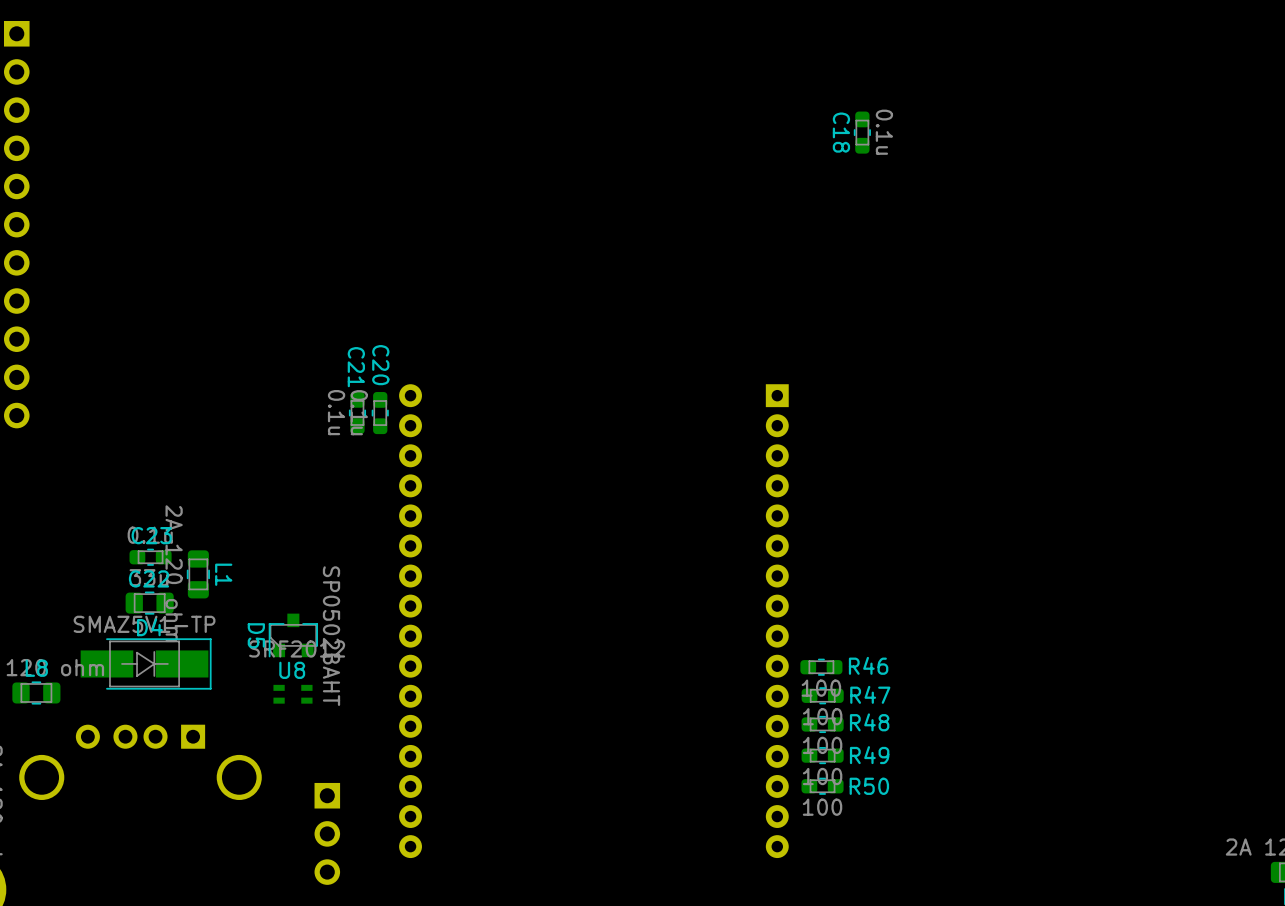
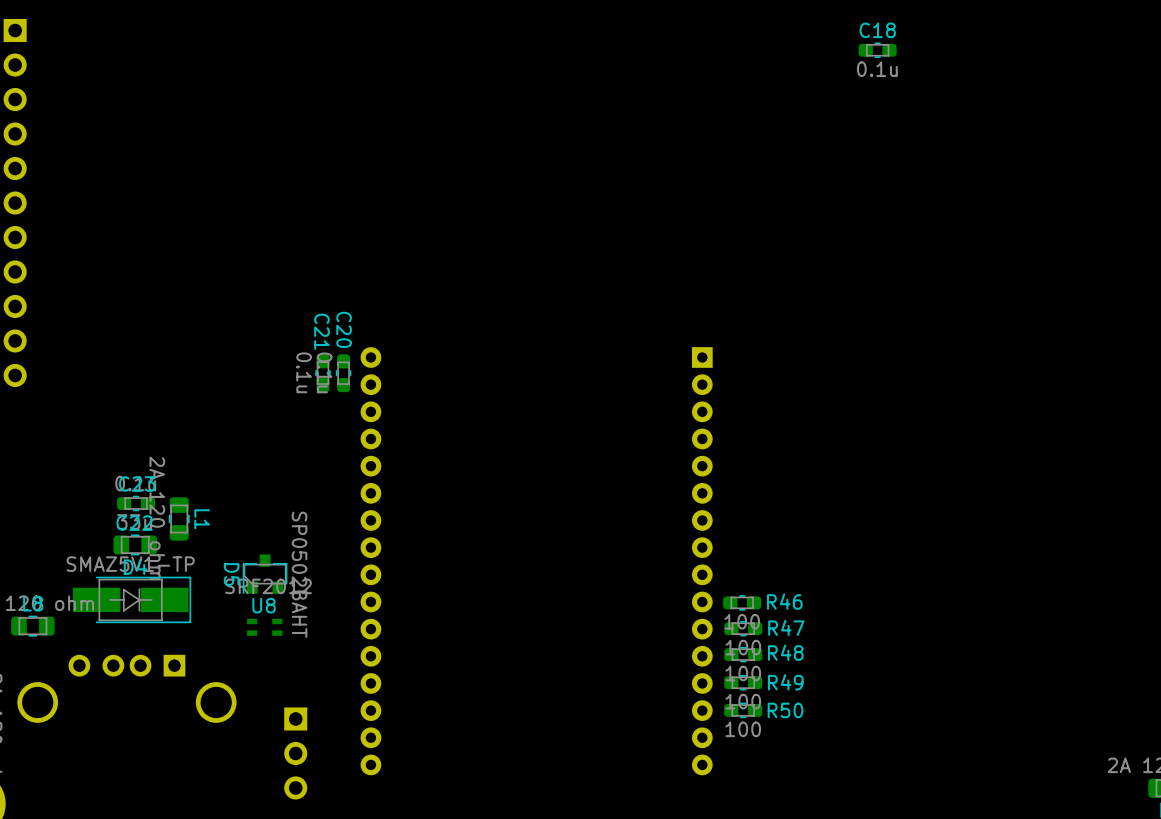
C18 rotation: 0° (862, 132) -> 90° clockwise (877, 50)
C18 position: (862, 132) -> (877, 50)

